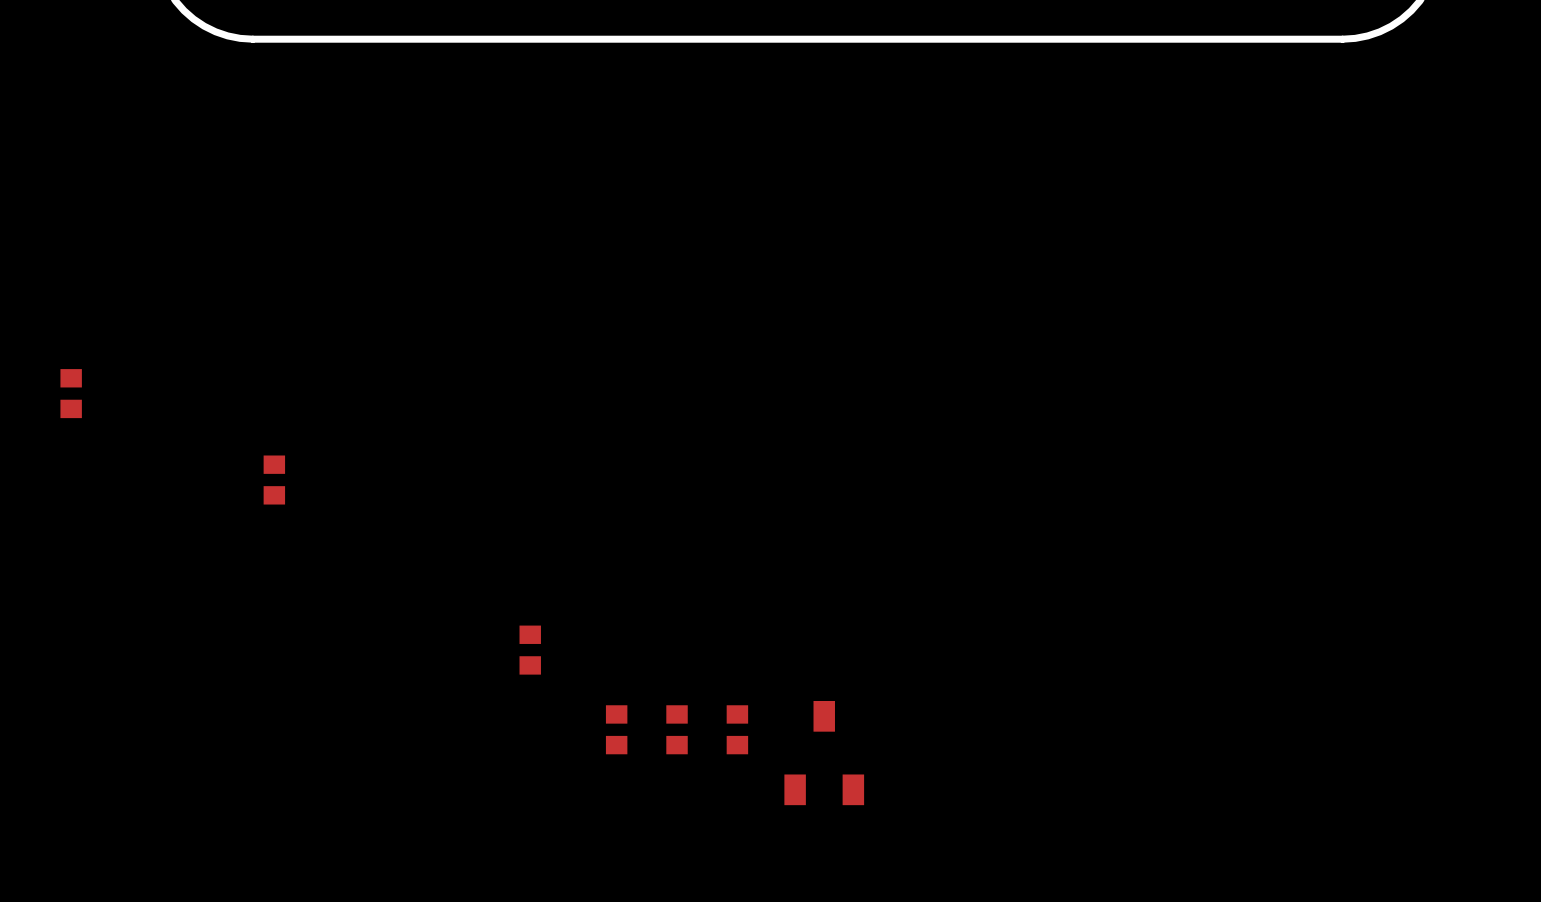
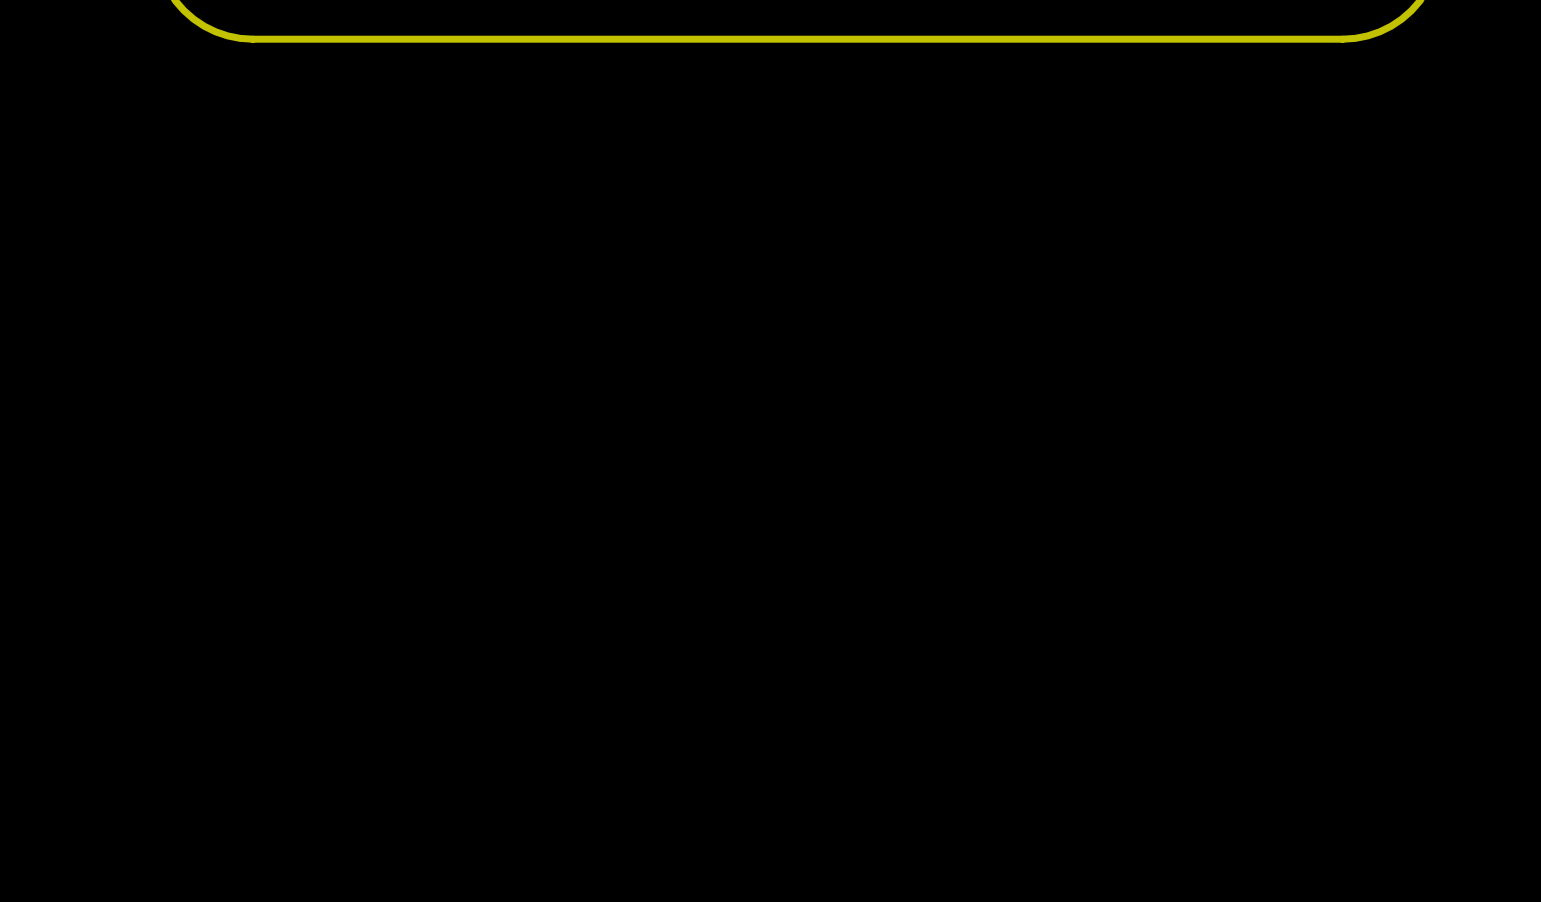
part: (71, 393) -> none
part: (274, 480) -> none
part: (530, 650) -> none
part: (616, 729) -> none
part: (677, 729) -> none
part: (737, 729) -> none
part: (824, 753) -> none

